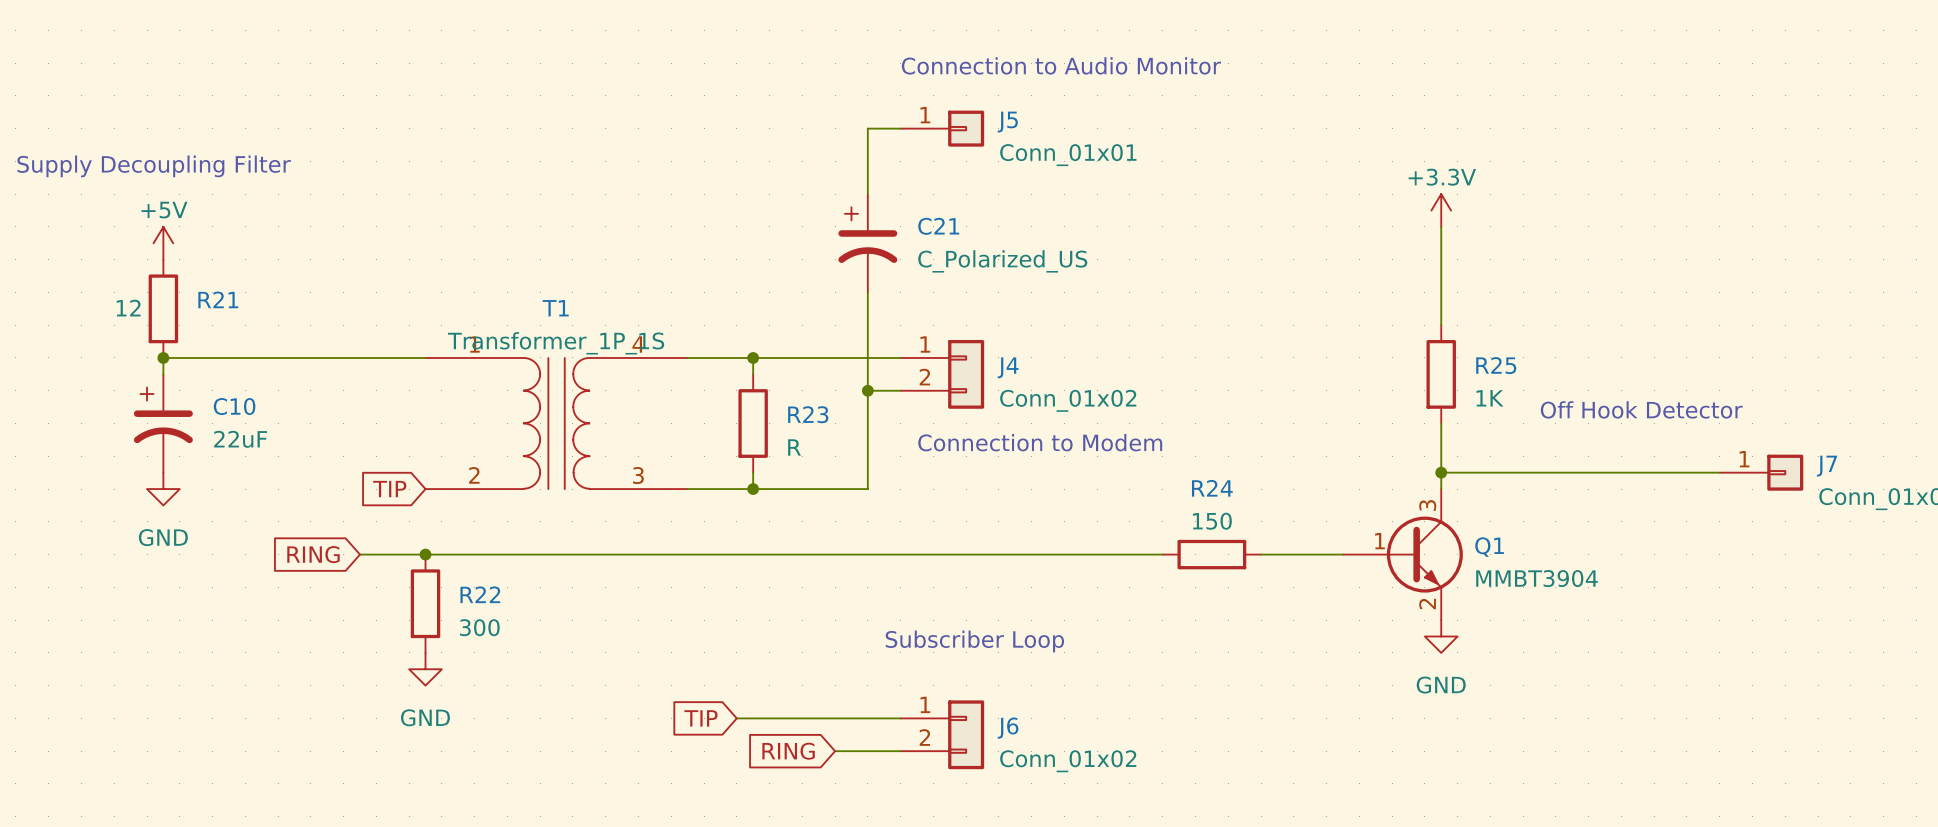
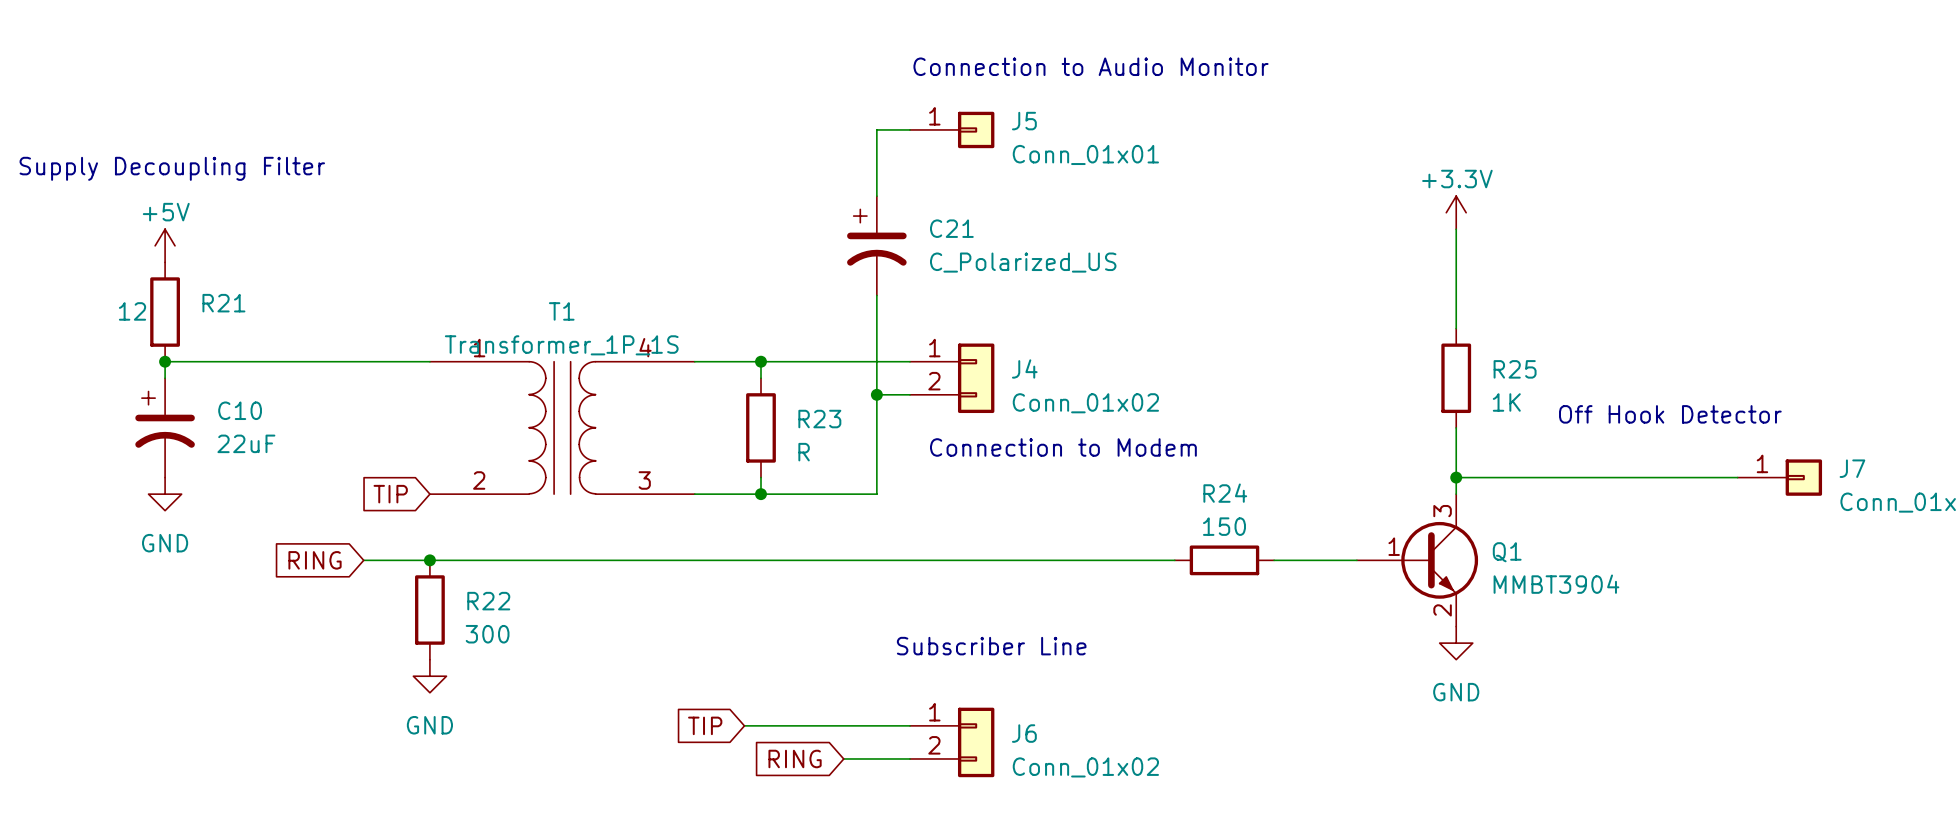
text: Subscriber Loop (974, 641) -> Subscriber Line (991, 646)

